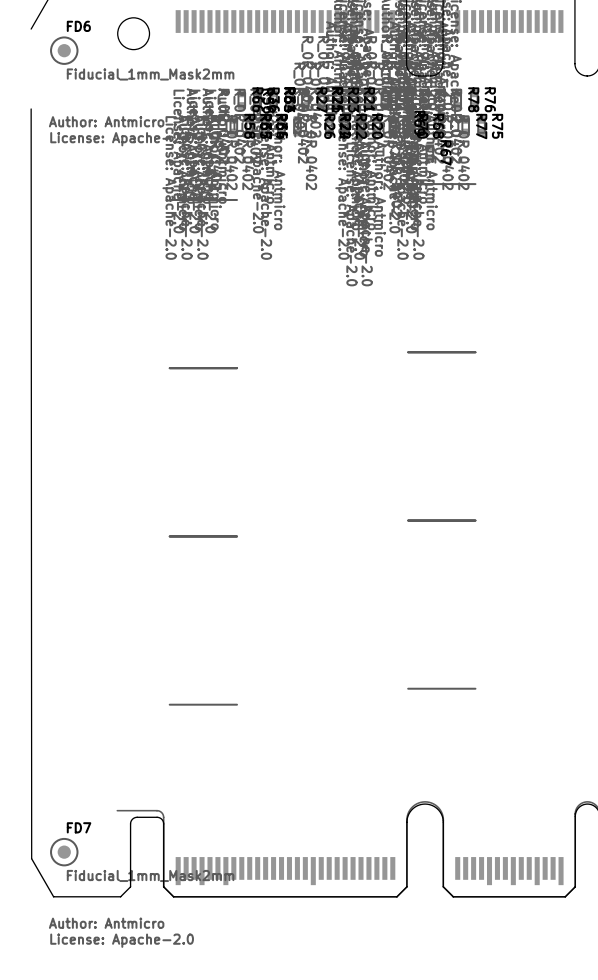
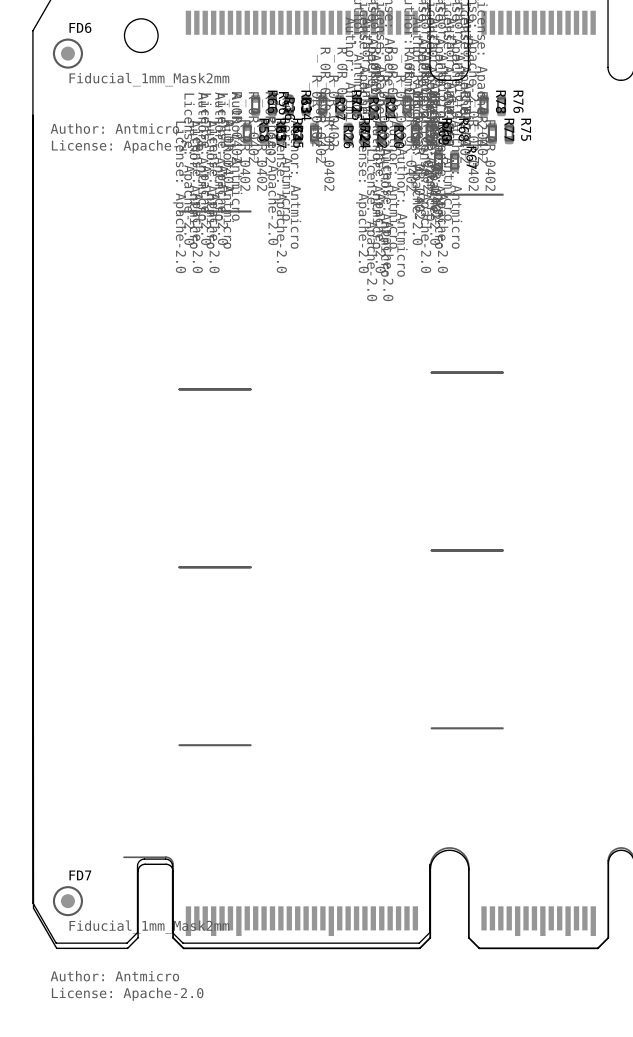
board edge: none -> (32, 30) (32, 902) (56, 943) (127, 943) (137, 932) (138, 863) (143, 859) (166, 859) (172, 865) (172, 932) (183, 943) (419, 943) (429, 932) (429, 864)

